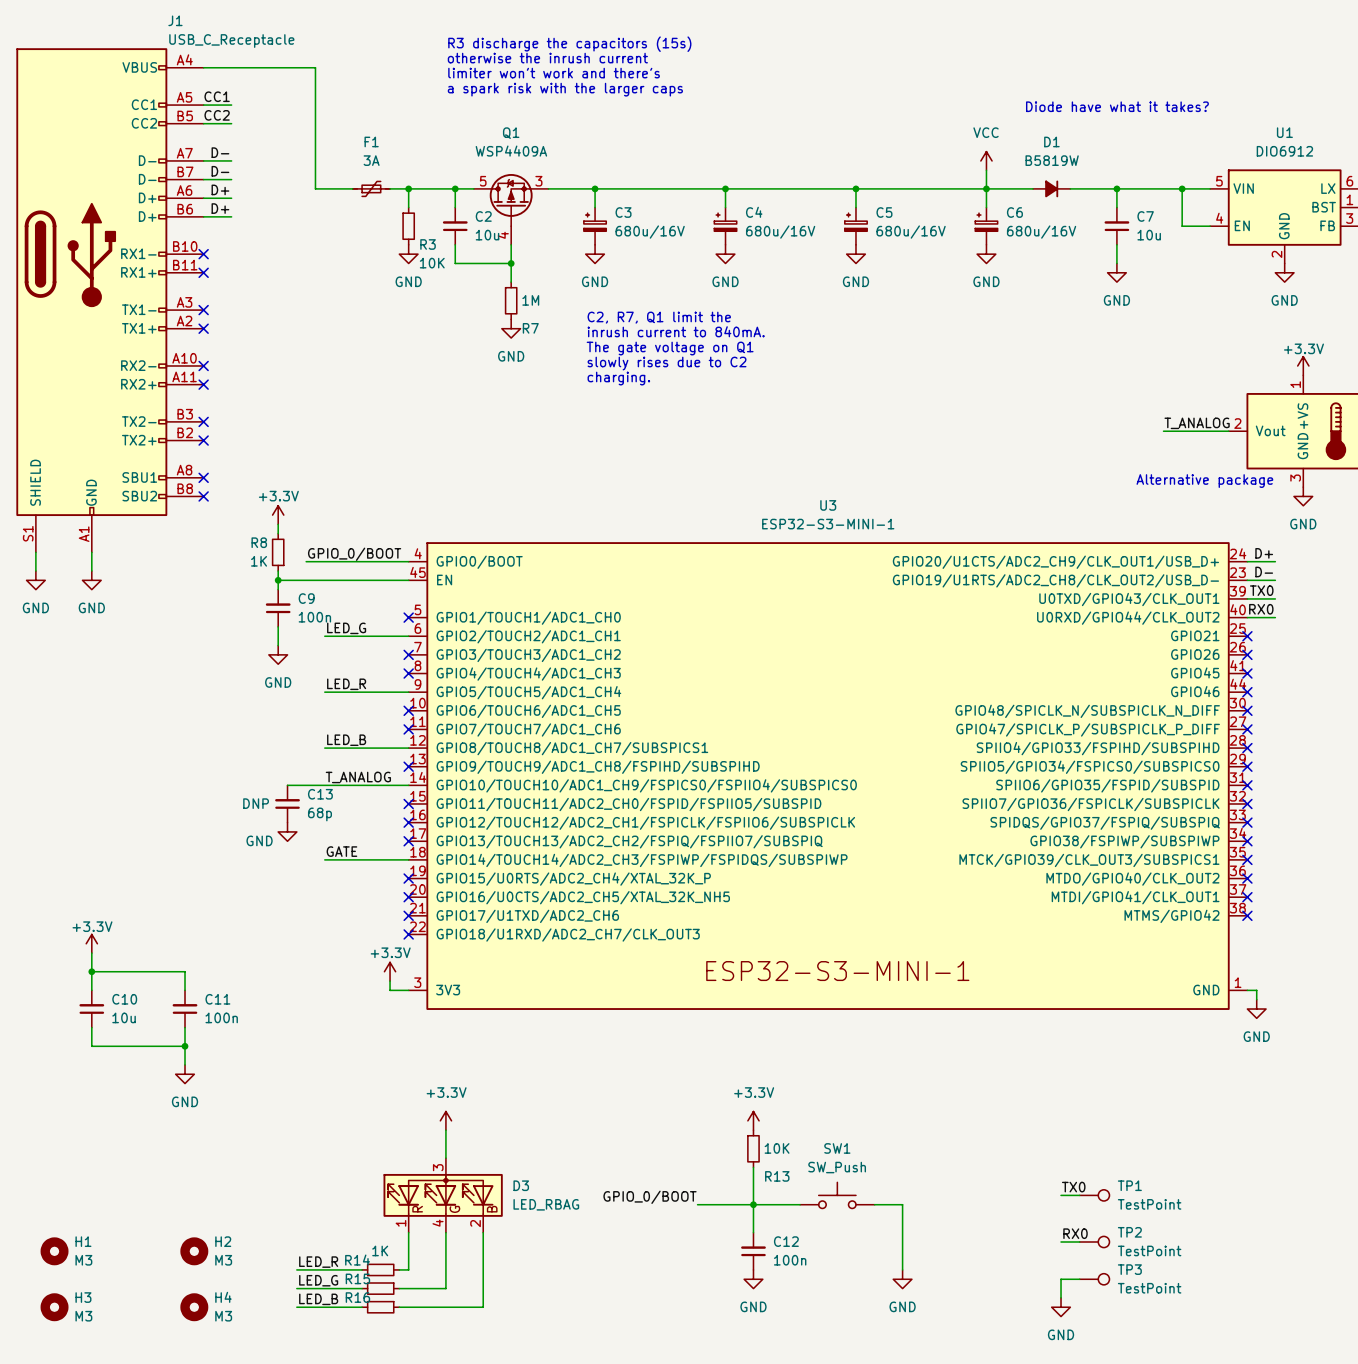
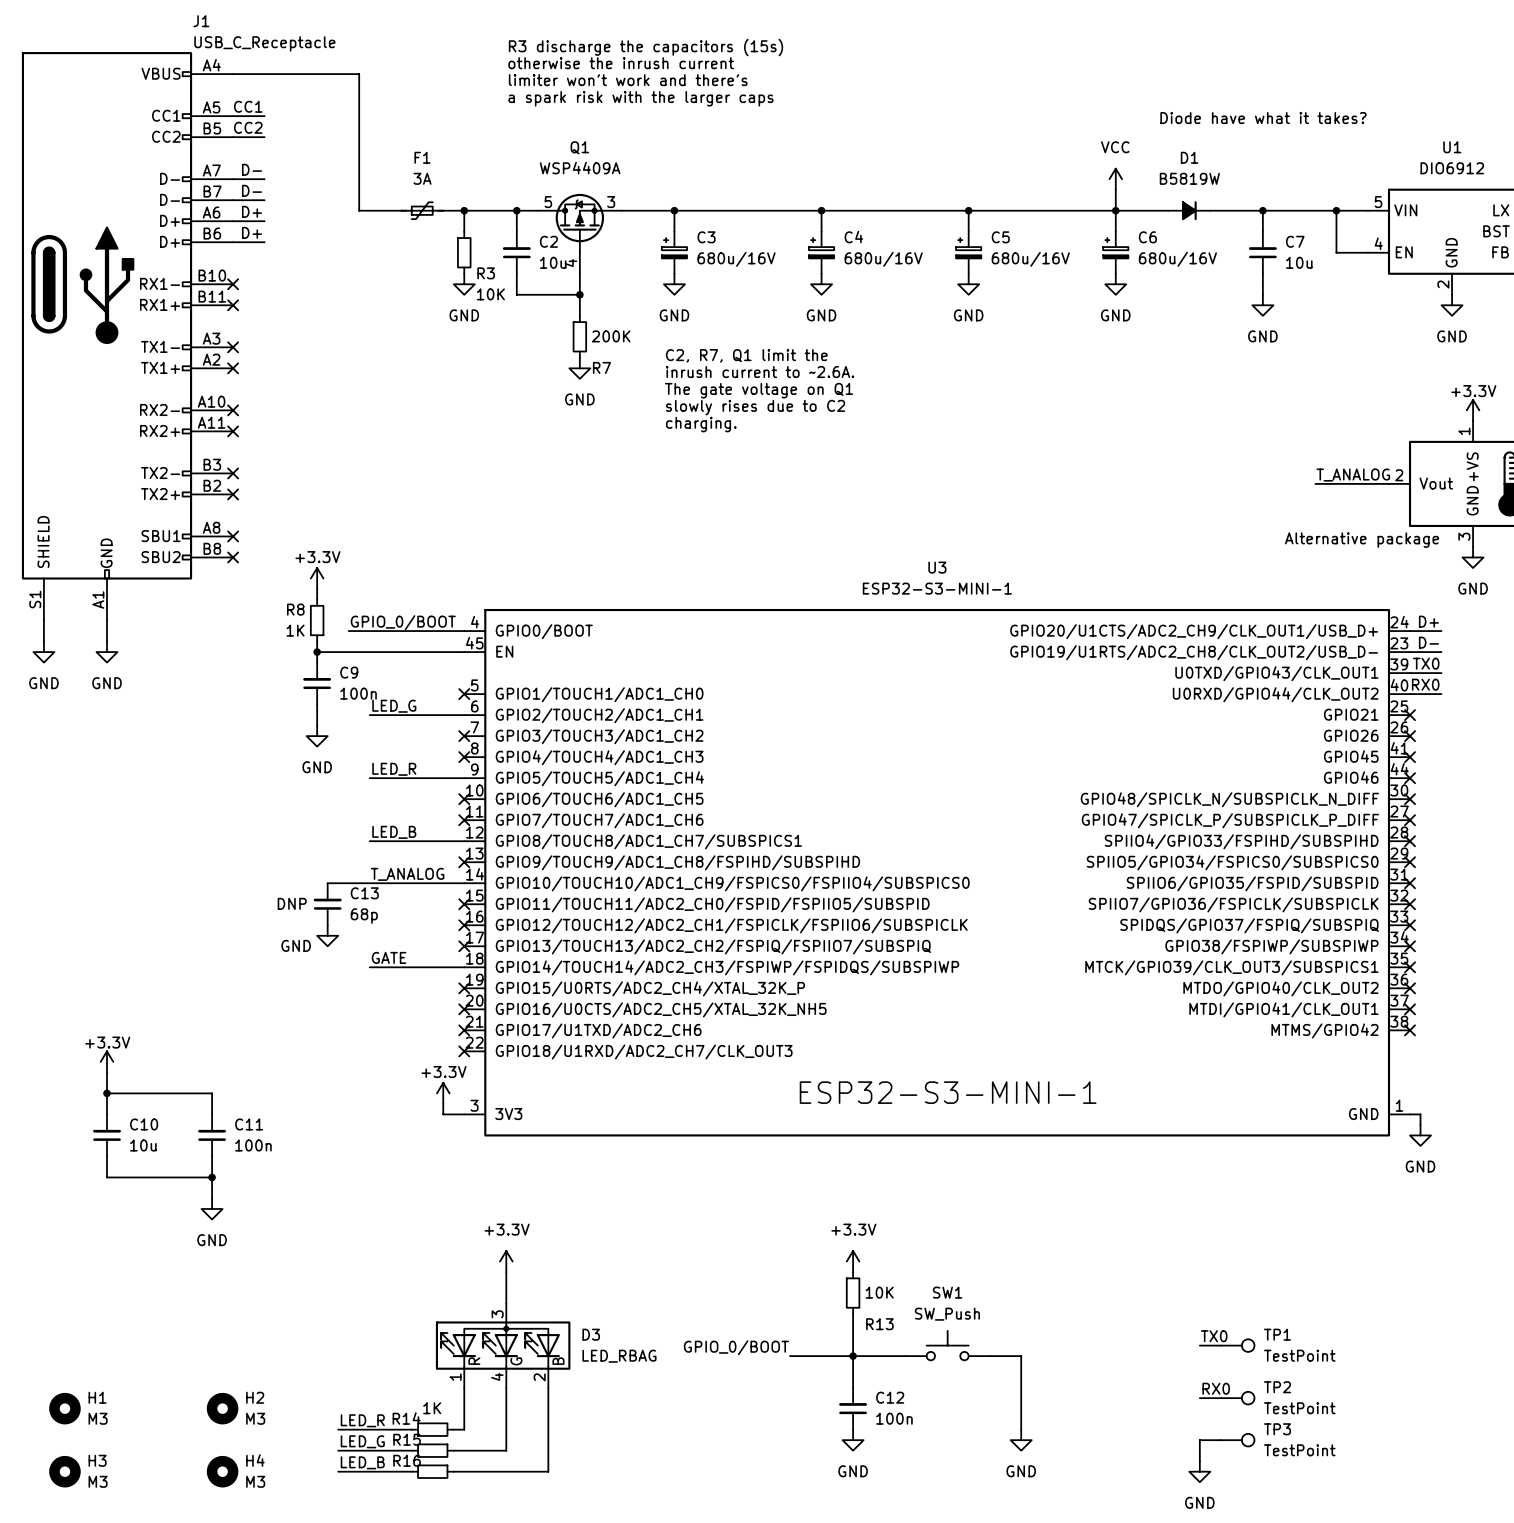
R7 value: 1M (530, 300) -> 200K (611, 336)
text: inrush current to 840mA. (676, 331) -> inrush current to ~2.6A. (760, 372)

